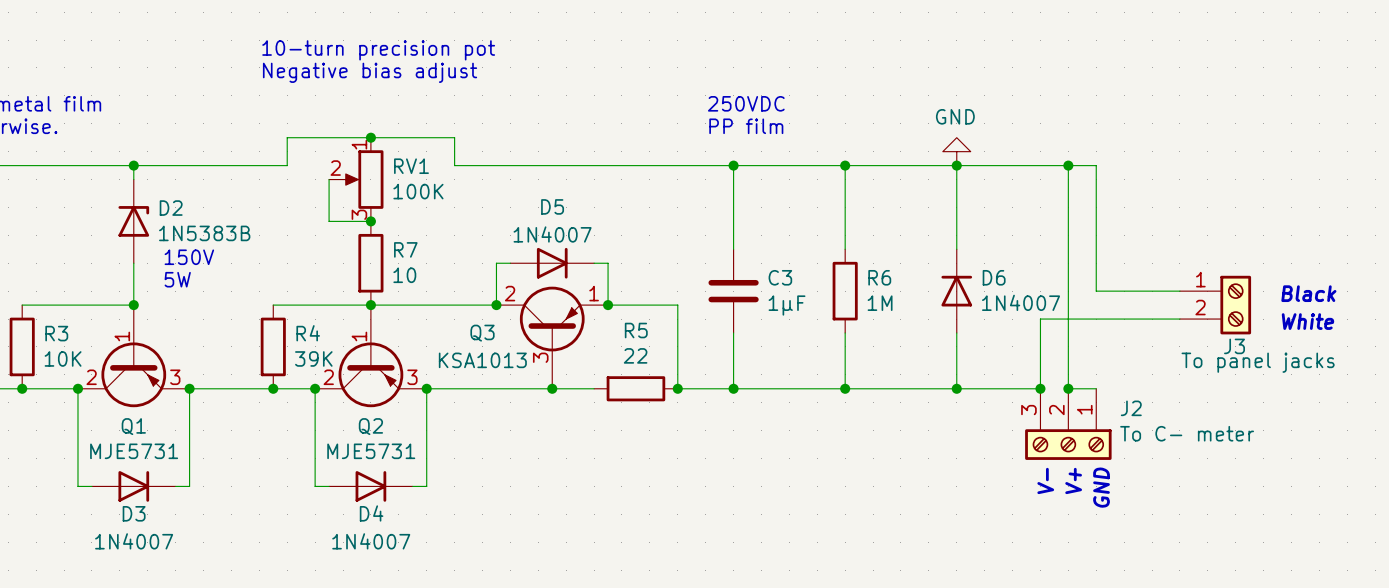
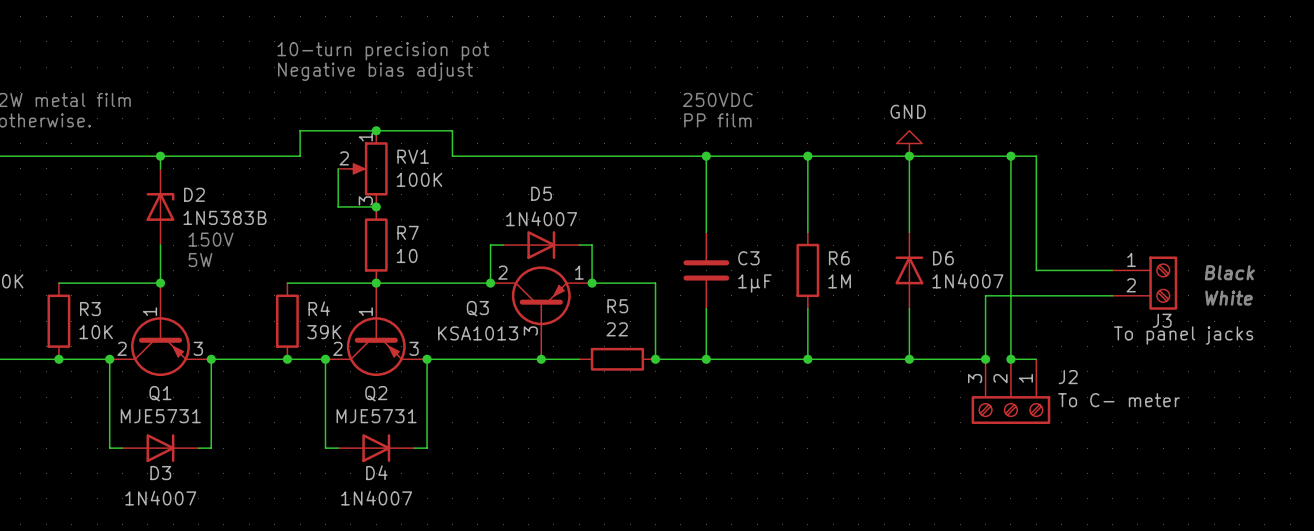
text: V- (1045, 480) -> none
text: V+ (1073, 480) -> none
text: GND (1101, 487) -> none

